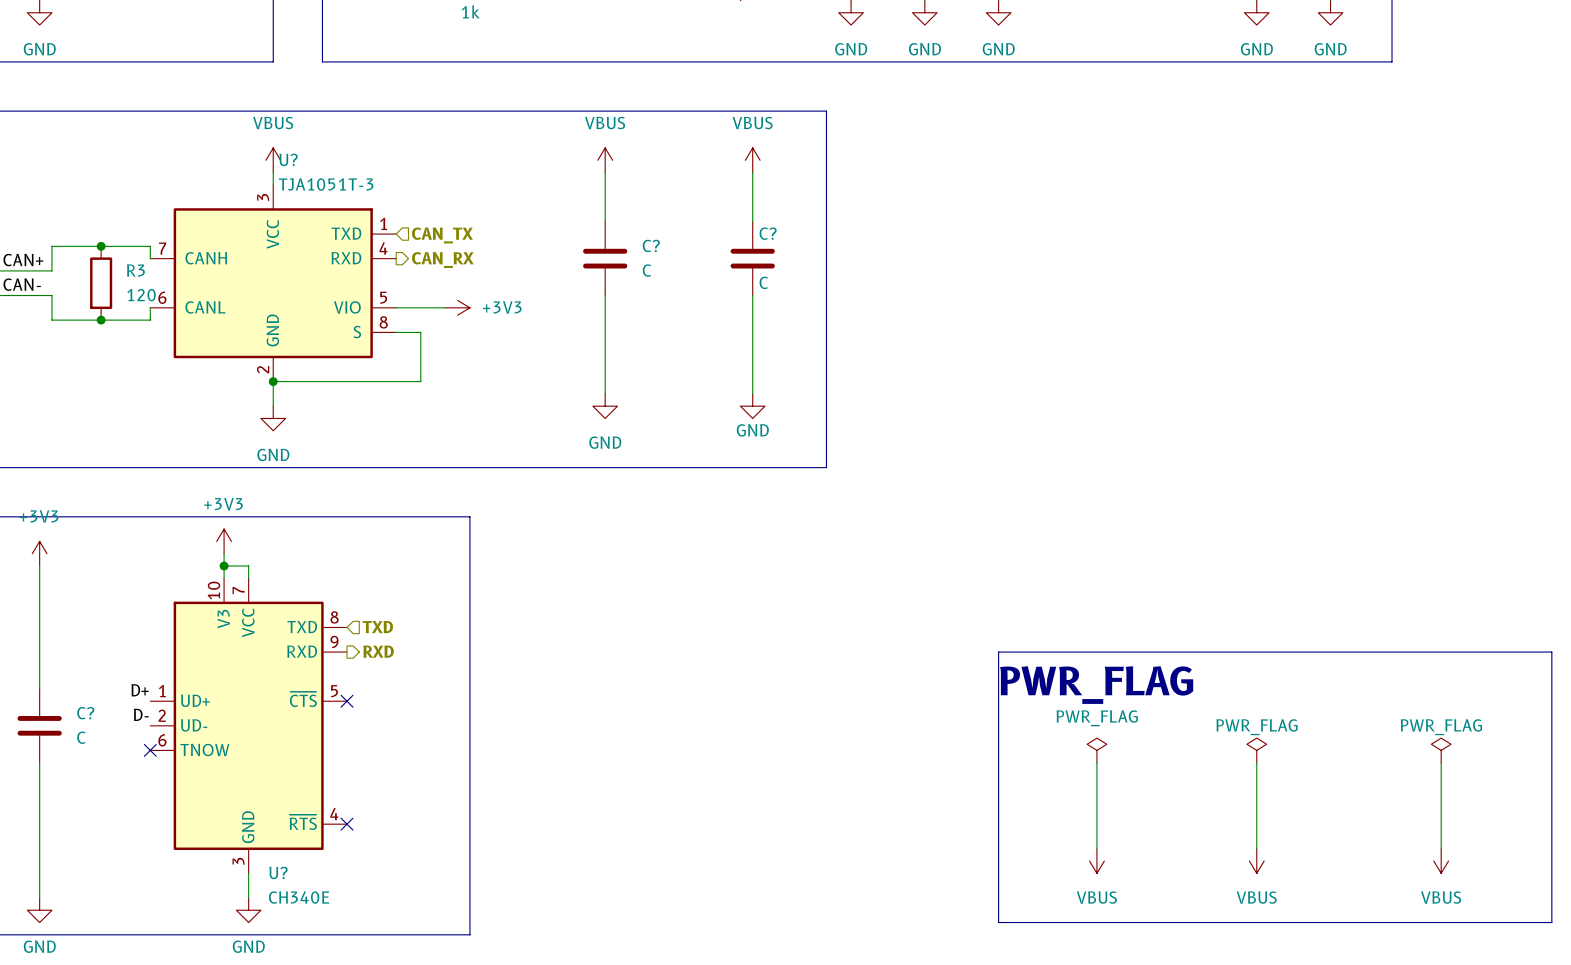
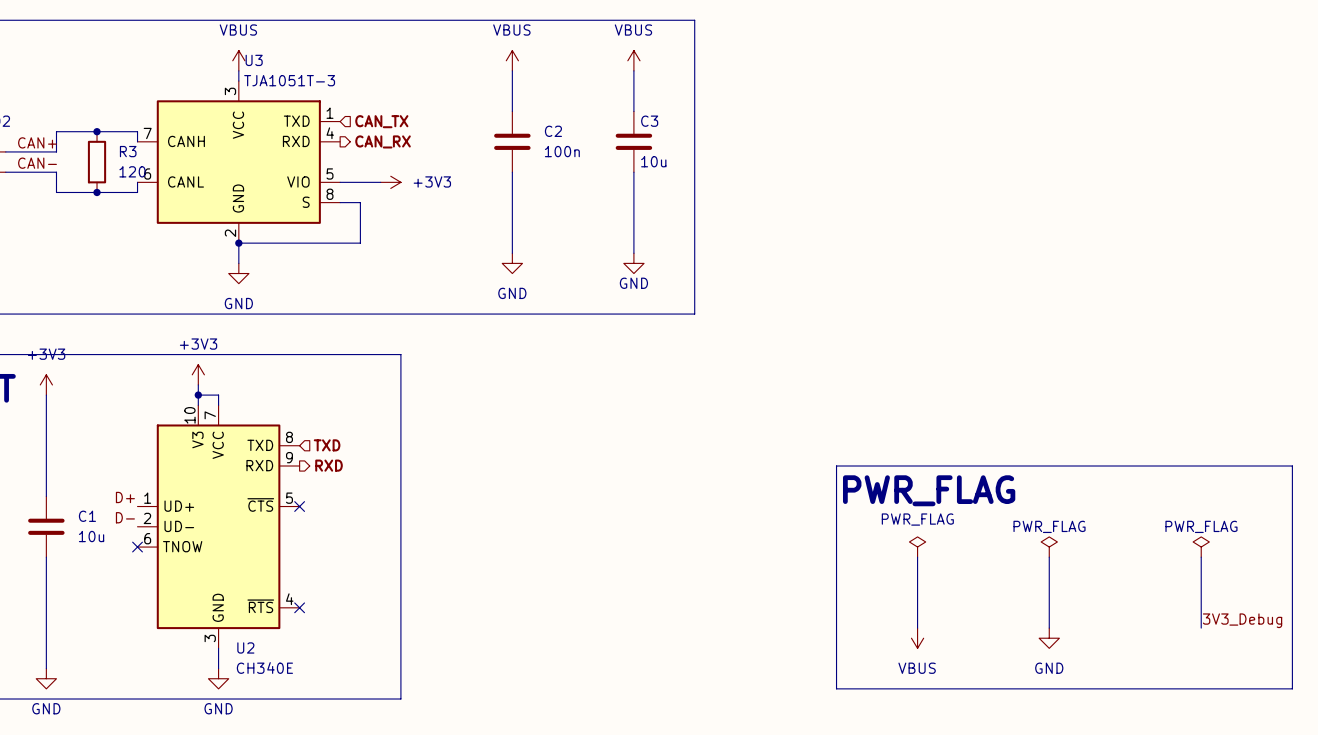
U? name: U? (288, 159) -> U3 (254, 60)
C? name: C? (768, 233) -> C3 (649, 121)
C? name: C? (651, 245) -> C2 (553, 131)
C? value: C (646, 270) -> 100n (562, 151)
C? value: C (763, 282) -> 10u (653, 161)
C? name: C? (85, 713) -> C1 (87, 516)
C? value: C (81, 737) -> 10u (91, 536)
label: none -> 3V3_Debug (1242, 620)
power symbol: VBUS (1256, 861) -> GND (1049, 638)
power symbol: VBUS (1441, 861) -> none
U? name: U? (278, 872) -> U2 (245, 647)

